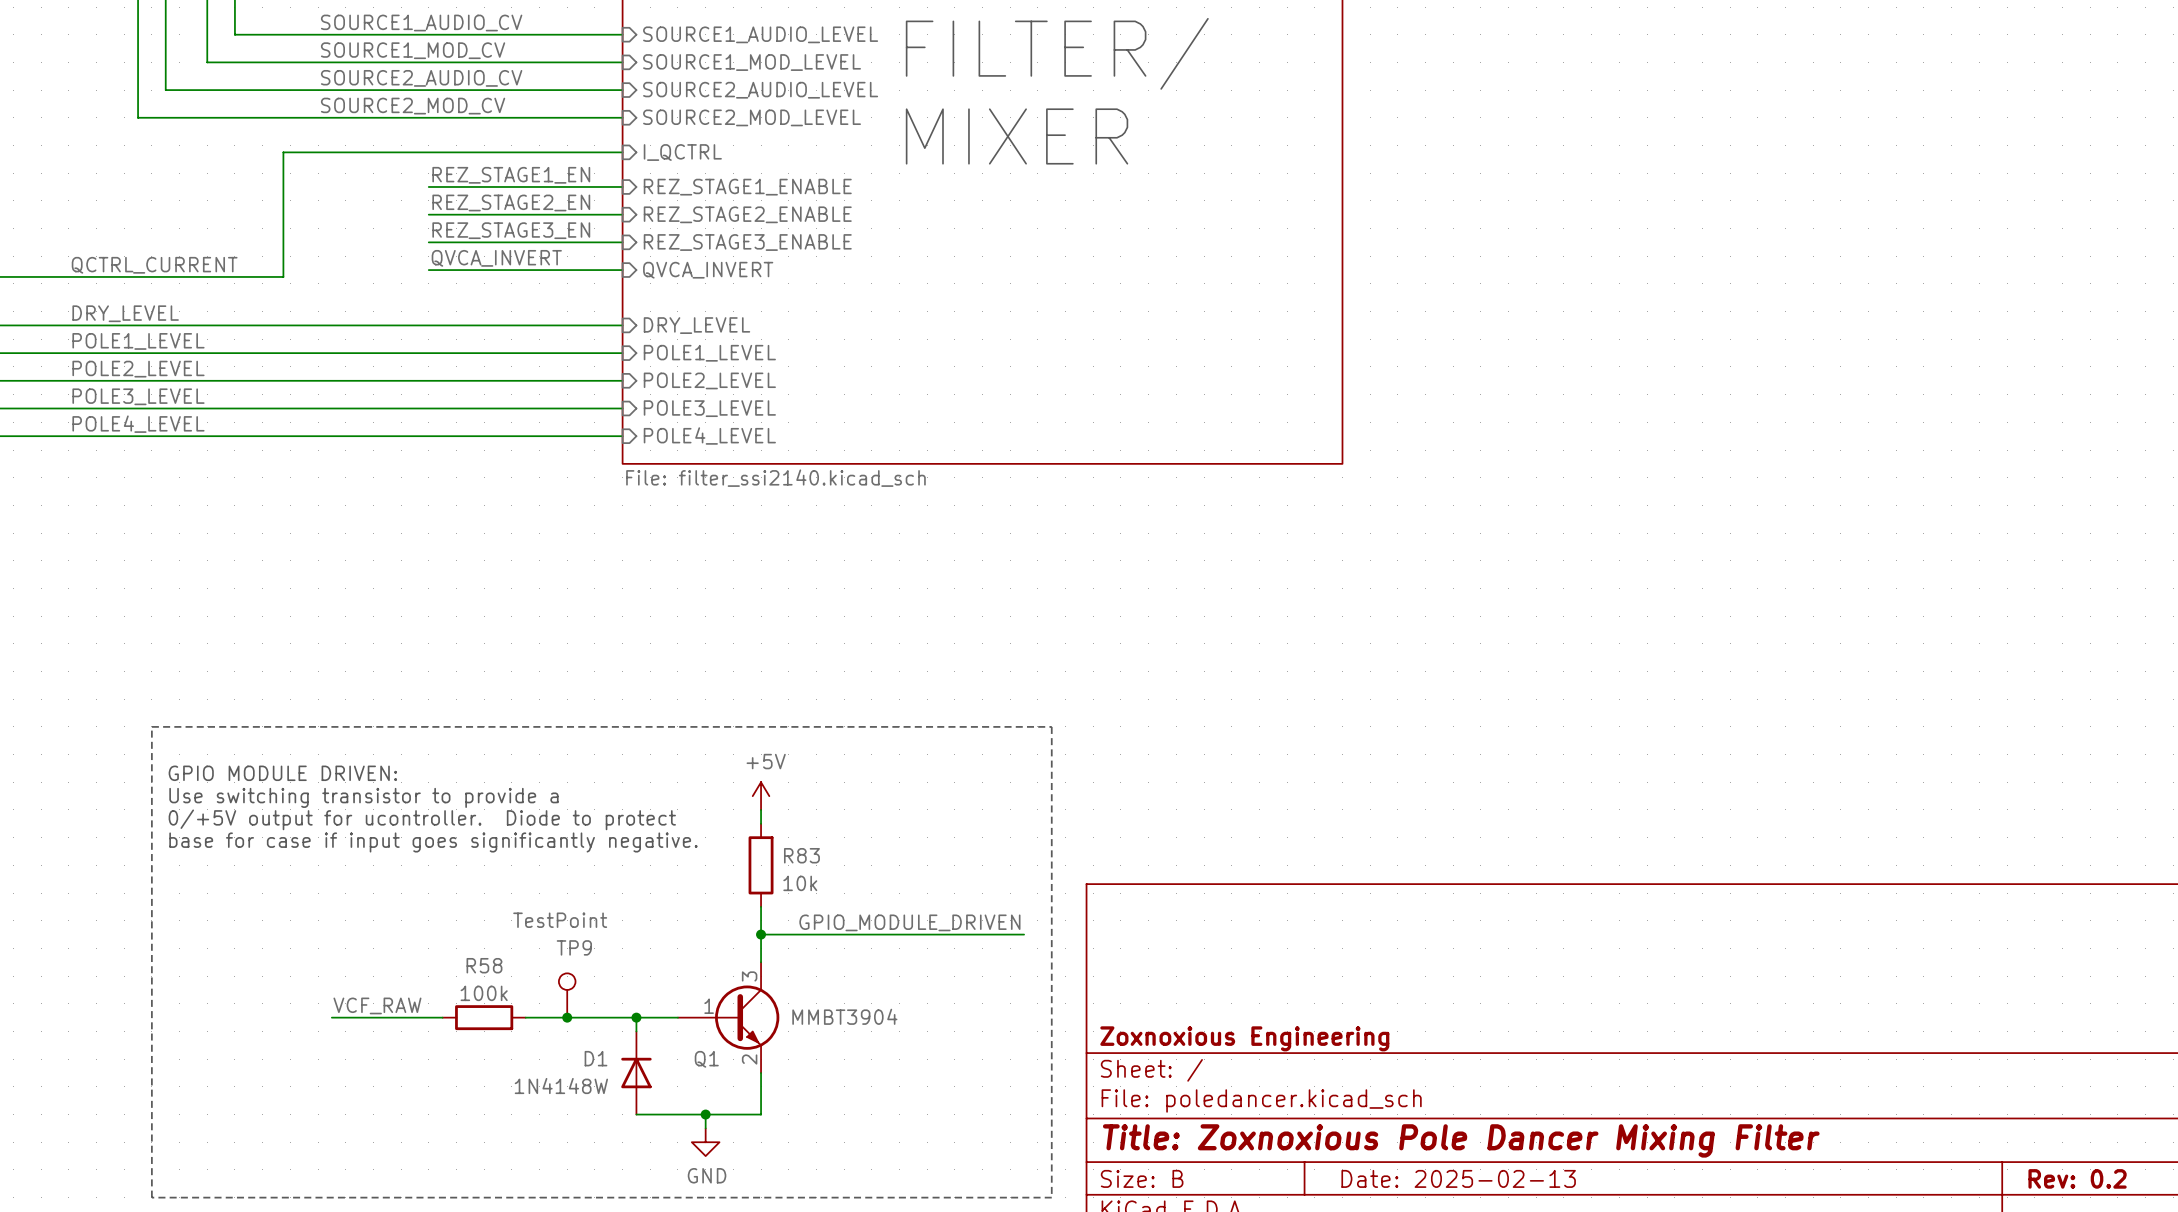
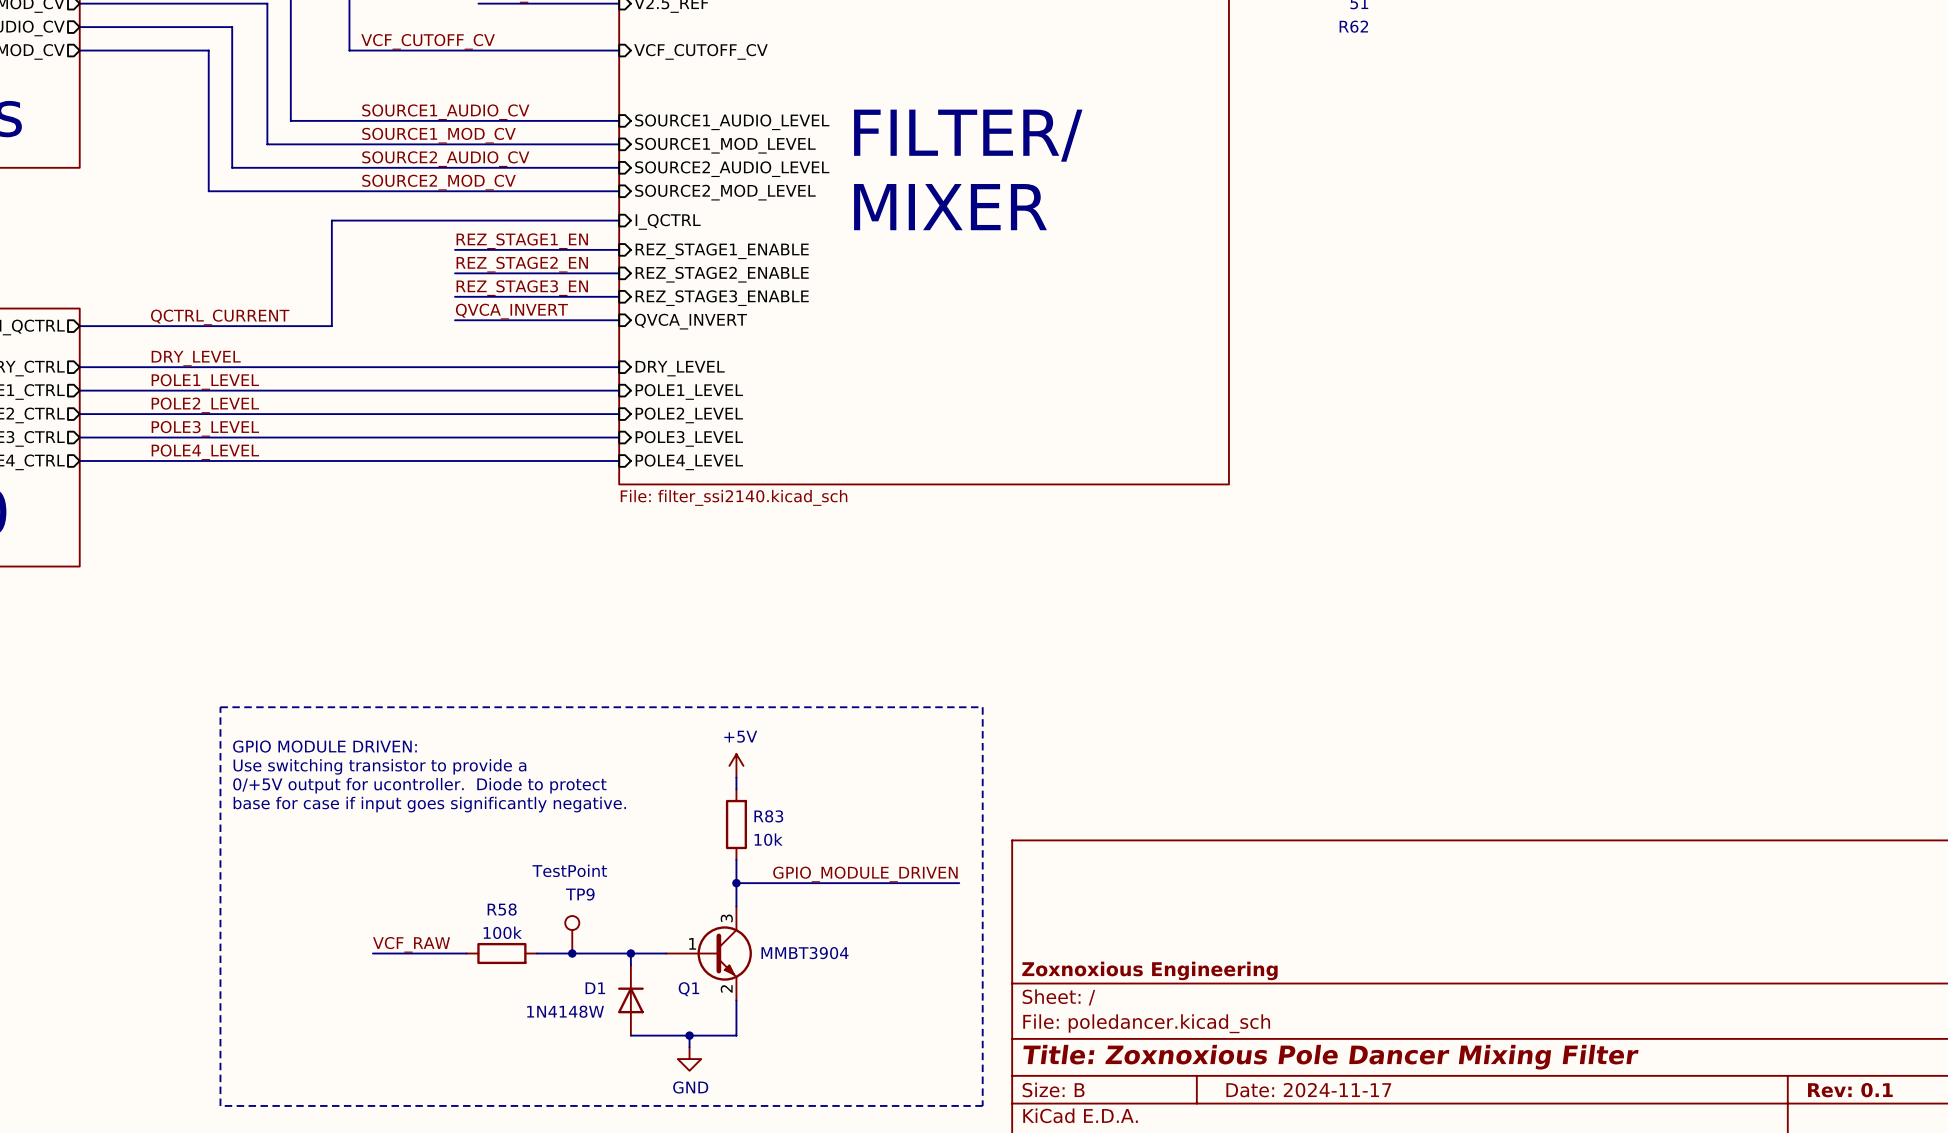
title block: Date: 2025-02-13 (1458, 1178) -> Date: 2024-11-17 (1308, 1090)
title block: Rev: 0.2 (2077, 1178) -> Rev: 0.1 (1850, 1090)

